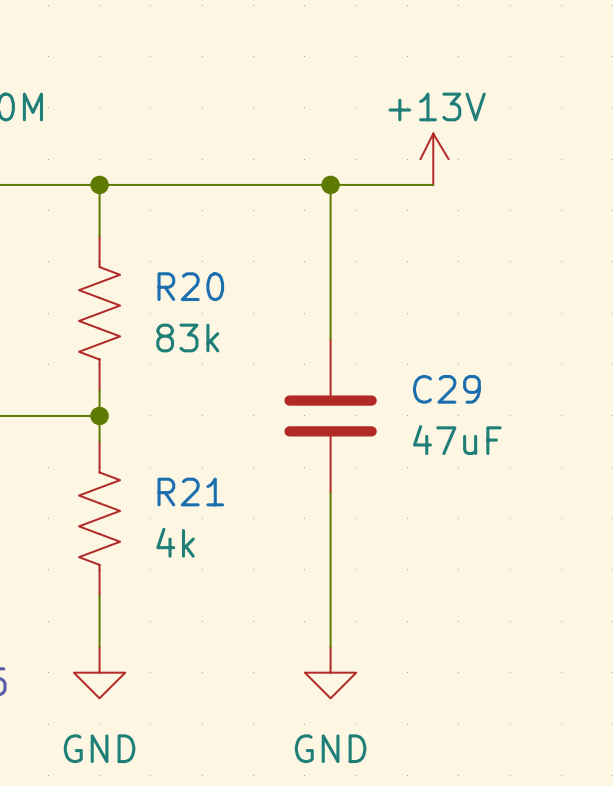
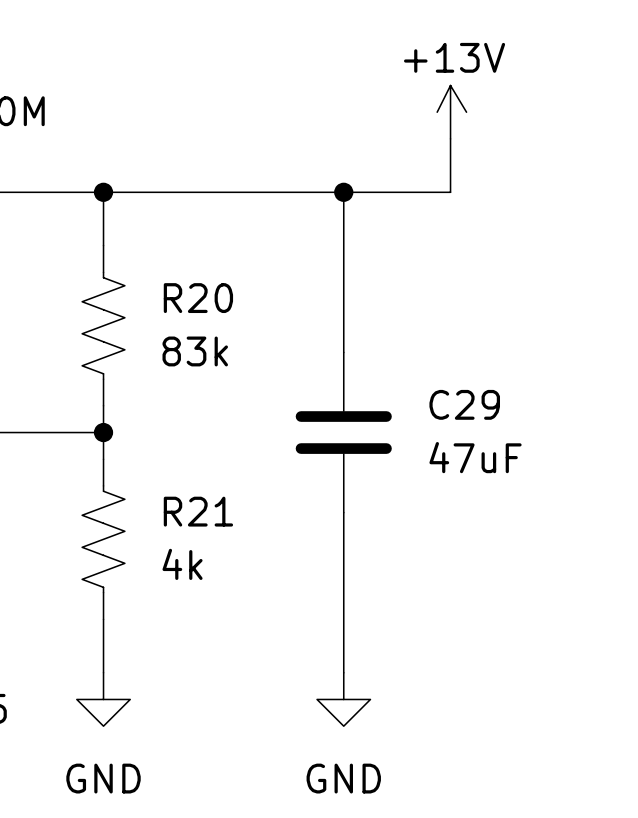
power symbol position: +13V (434, 159) -> +13V (451, 112)

